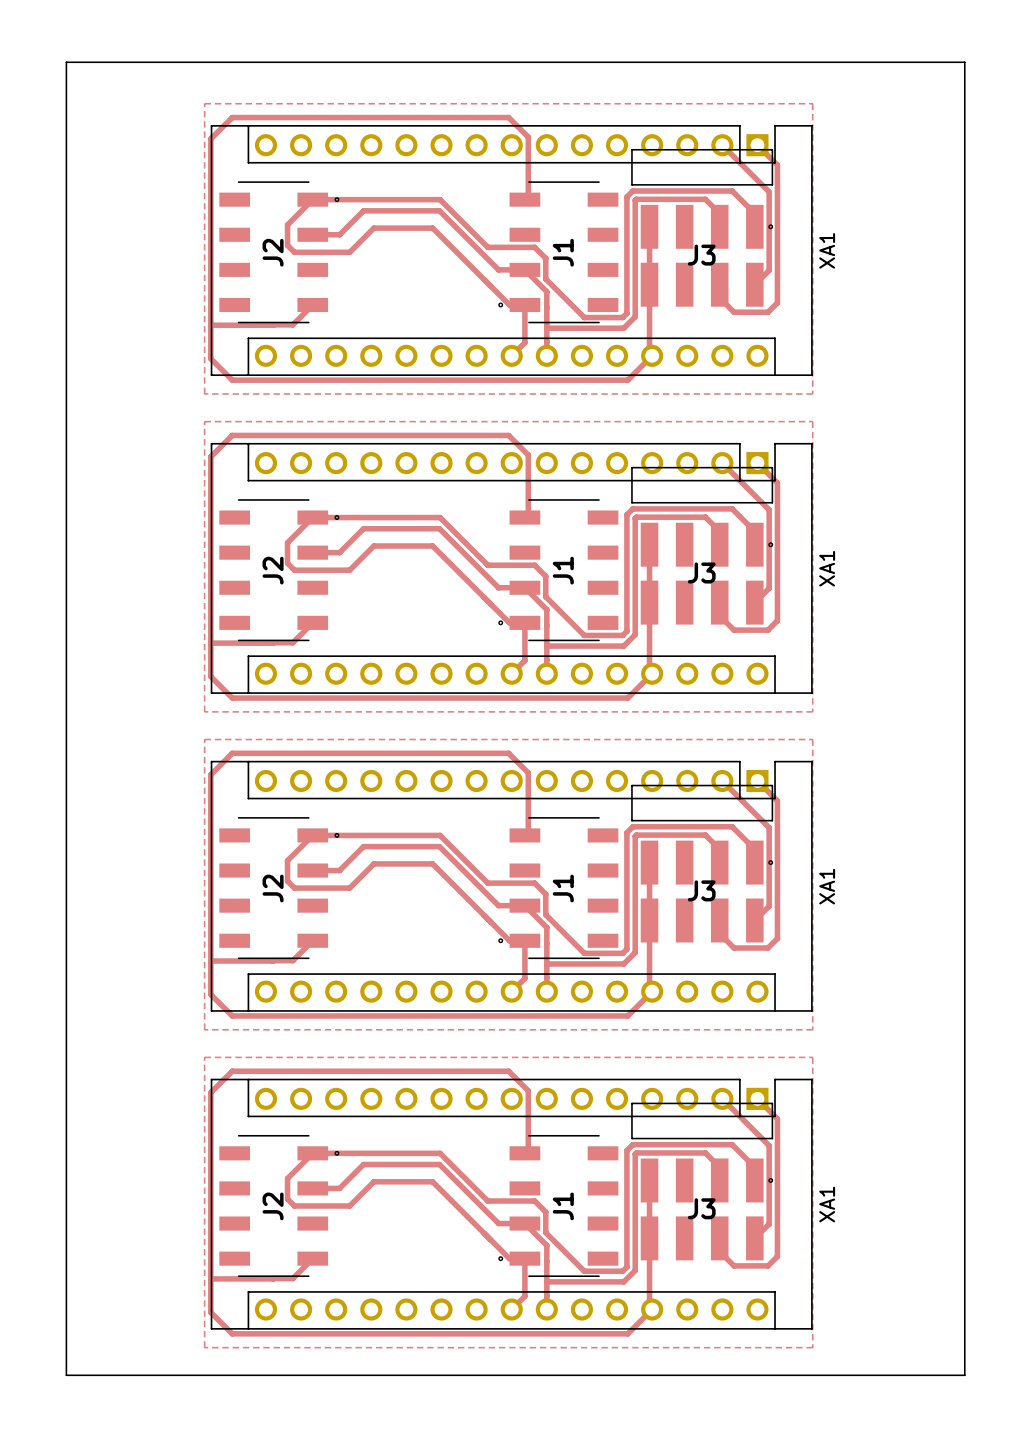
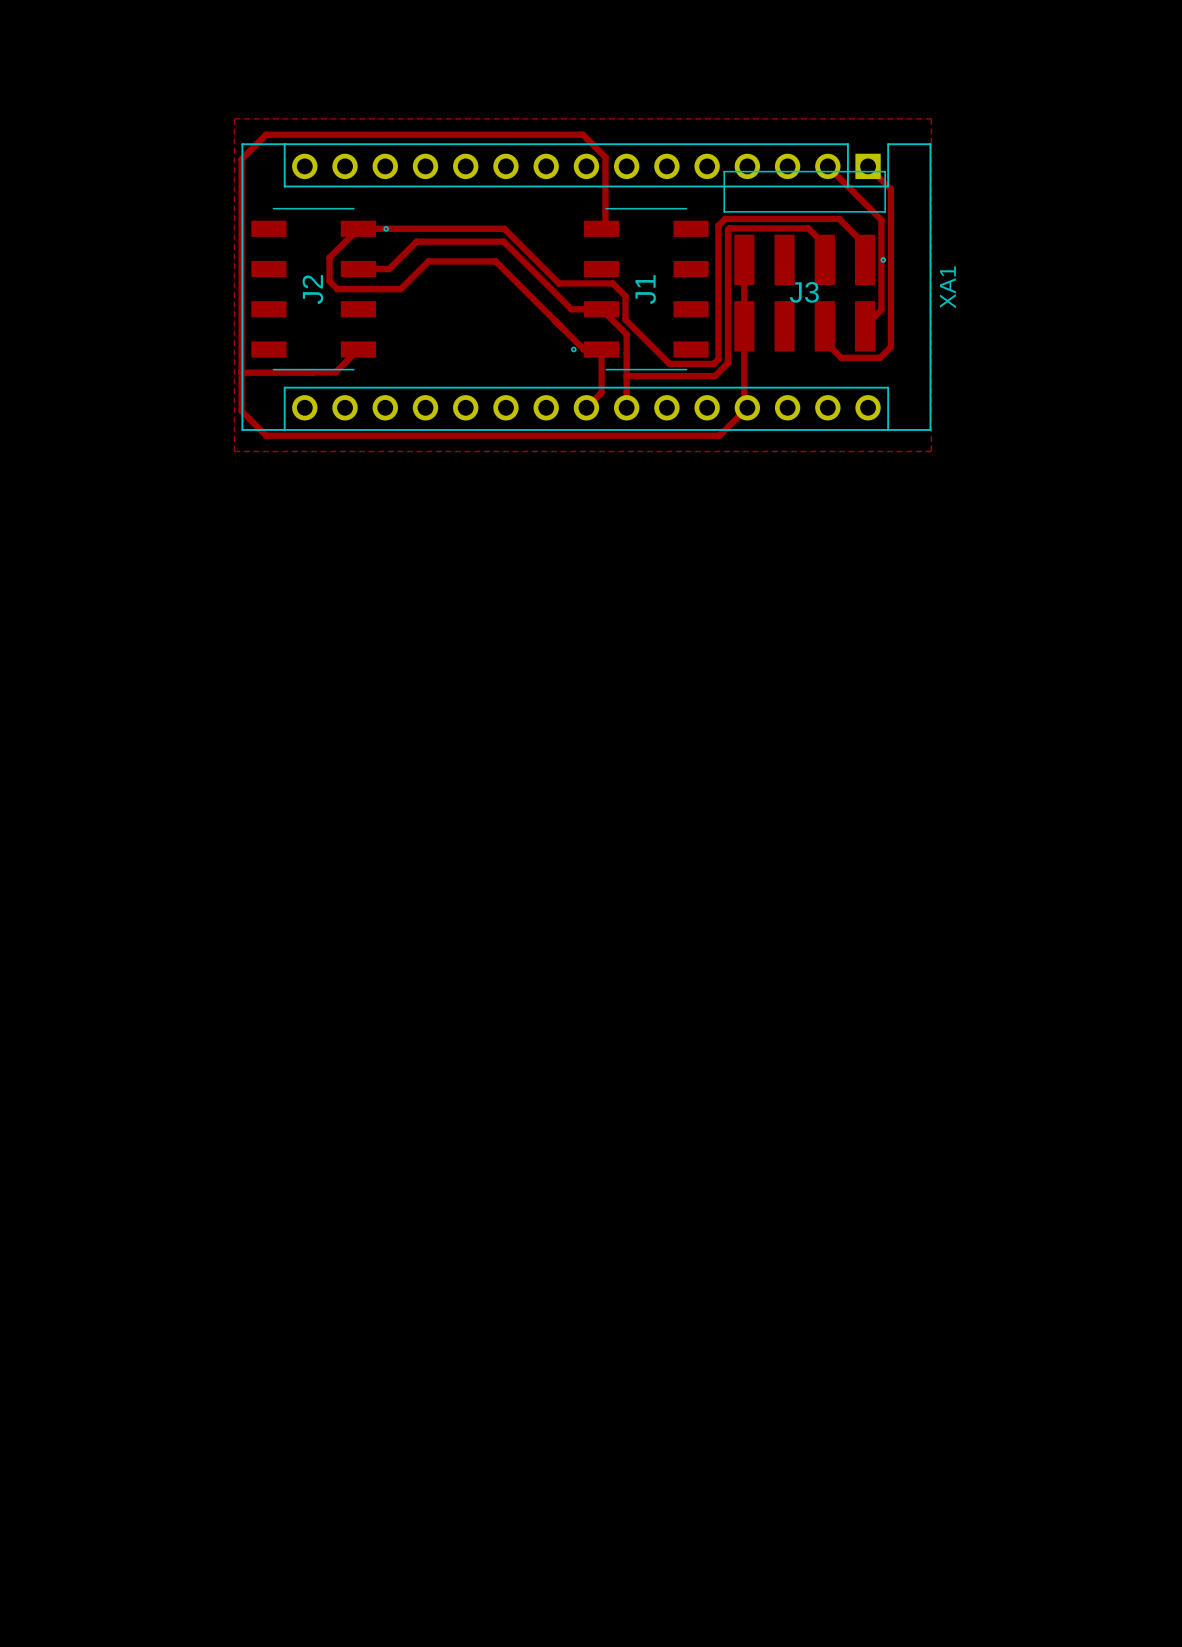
board edge: (66, 62) (66, 1375) (964, 1375) (964, 62) (66, 62) -> none
zone outline: (204, 421) (204, 711) (812, 711) (812, 421) (204, 421) -> none
track: (722, 463) (769, 509) (769, 588) (754, 602) -> none
track: (757, 463) (777, 483) (777, 620) (768, 630) (734, 630) (719, 615) (719, 602) -> none
track: (524, 517) (528, 514) (528, 455) (508, 435) (232, 435) (210, 456) (210, 676) (232, 698) (627, 698) (652, 673) (649, 671) (649, 544) -> none
track: (719, 544) (719, 531) (705, 517) (636, 517) (635, 634) (623, 646) (546, 646) -> none
track: (754, 544) (754, 531) (732, 508) (632, 508) (626, 514) (626, 631) (622, 635) (584, 635) (545, 596) (545, 576) (534, 565) (487, 565) (440, 517) (312, 517) (287, 542) (287, 563) (294, 570) (349, 570) (373, 546) (432, 546) (509, 622) (524, 622) (524, 660) (511, 673) -> none
J3: (702, 545) -> none
track: (312, 552) (339, 552) (363, 528) (439, 528) (498, 587) (524, 587) (546, 609) (546, 673) -> none
XA1: (511, 568) -> none
J2: (279, 570) -> none
J1: (558, 570) -> none
track: (312, 622) (292, 642) (272, 642) -> none
track: (273, 642) (210, 643) -> none
zone outline: (204, 739) (204, 1029) (812, 1029) (812, 739) (204, 739) -> none
track: (722, 780) (769, 827) (769, 906) (754, 920) -> none
track: (757, 780) (777, 800) (777, 938) (768, 948) (734, 948) (719, 933) (719, 920) -> none
track: (524, 835) (528, 832) (528, 772) (508, 753) (232, 753) (210, 774) (210, 994) (232, 1015) (627, 1015) (652, 991) (649, 988) (649, 862) -> none
track: (719, 862) (719, 849) (705, 835) (636, 835) (635, 952) (623, 963) (546, 963) -> none
track: (754, 862) (754, 849) (732, 826) (632, 826) (626, 832) (626, 949) (622, 953) (584, 953) (545, 914) (545, 894) (534, 883) (487, 883) (440, 835) (312, 835) (287, 860) (287, 881) (294, 888) (349, 888) (373, 863) (432, 863) (509, 940) (524, 940) (524, 978) (511, 991) -> none
J3: (702, 863) -> none
track: (312, 870) (339, 870) (363, 846) (439, 846) (498, 905) (524, 905) (546, 927) (546, 991) -> none
XA1: (511, 886) -> none
J2: (279, 888) -> none
J1: (558, 888) -> none
track: (312, 940) (292, 960) (272, 960) -> none
track: (273, 960) (210, 961) -> none
zone outline: (204, 1057) (204, 1347) (812, 1347) (812, 1057) (204, 1057) -> none
track: (722, 1098) (769, 1145) (769, 1224) (754, 1238) -> none
track: (757, 1098) (777, 1118) (777, 1256) (768, 1265) (734, 1265) (719, 1251) (719, 1238) -> none
track: (524, 1153) (528, 1149) (528, 1090) (508, 1071) (232, 1071) (210, 1092) (210, 1312) (232, 1333) (627, 1333) (652, 1309) (649, 1306) (649, 1180) -> none
track: (719, 1180) (719, 1167) (705, 1152) (636, 1152) (635, 1270) (623, 1281) (546, 1281) -> none
track: (754, 1180) (754, 1167) (732, 1144) (632, 1144) (626, 1150) (626, 1267) (622, 1271) (584, 1271) (545, 1232) (545, 1212) (534, 1201) (487, 1201) (440, 1153) (312, 1153) (287, 1178) (287, 1199) (294, 1205) (349, 1205) (373, 1181) (432, 1181) (509, 1258) (524, 1258) (524, 1296) (511, 1309) -> none
J3: (702, 1181) -> none
track: (312, 1188) (339, 1188) (363, 1164) (439, 1164) (498, 1223) (524, 1223) (546, 1245) (546, 1309) -> none
XA1: (511, 1204) -> none
J2: (279, 1205) -> none
J1: (558, 1205) -> none
track: (312, 1258) (292, 1278) (272, 1278) -> none
track: (273, 1278) (210, 1278) -> none

